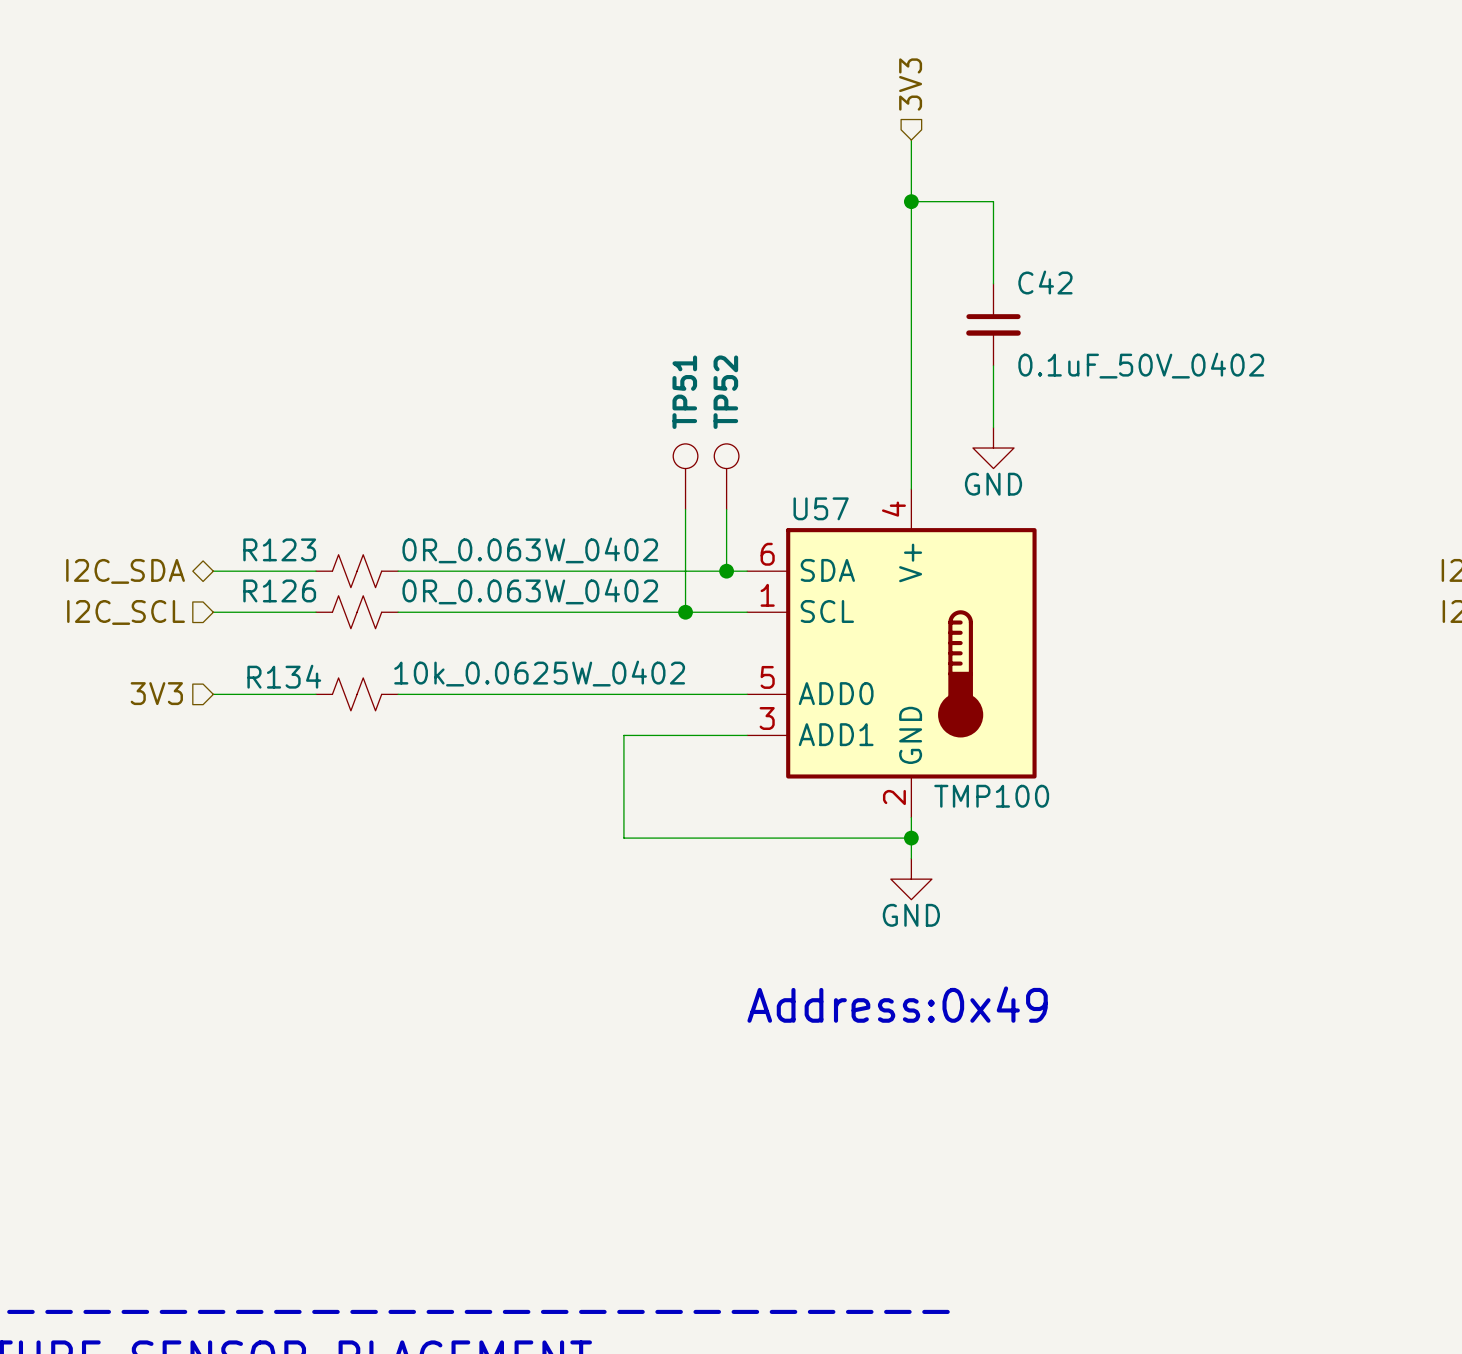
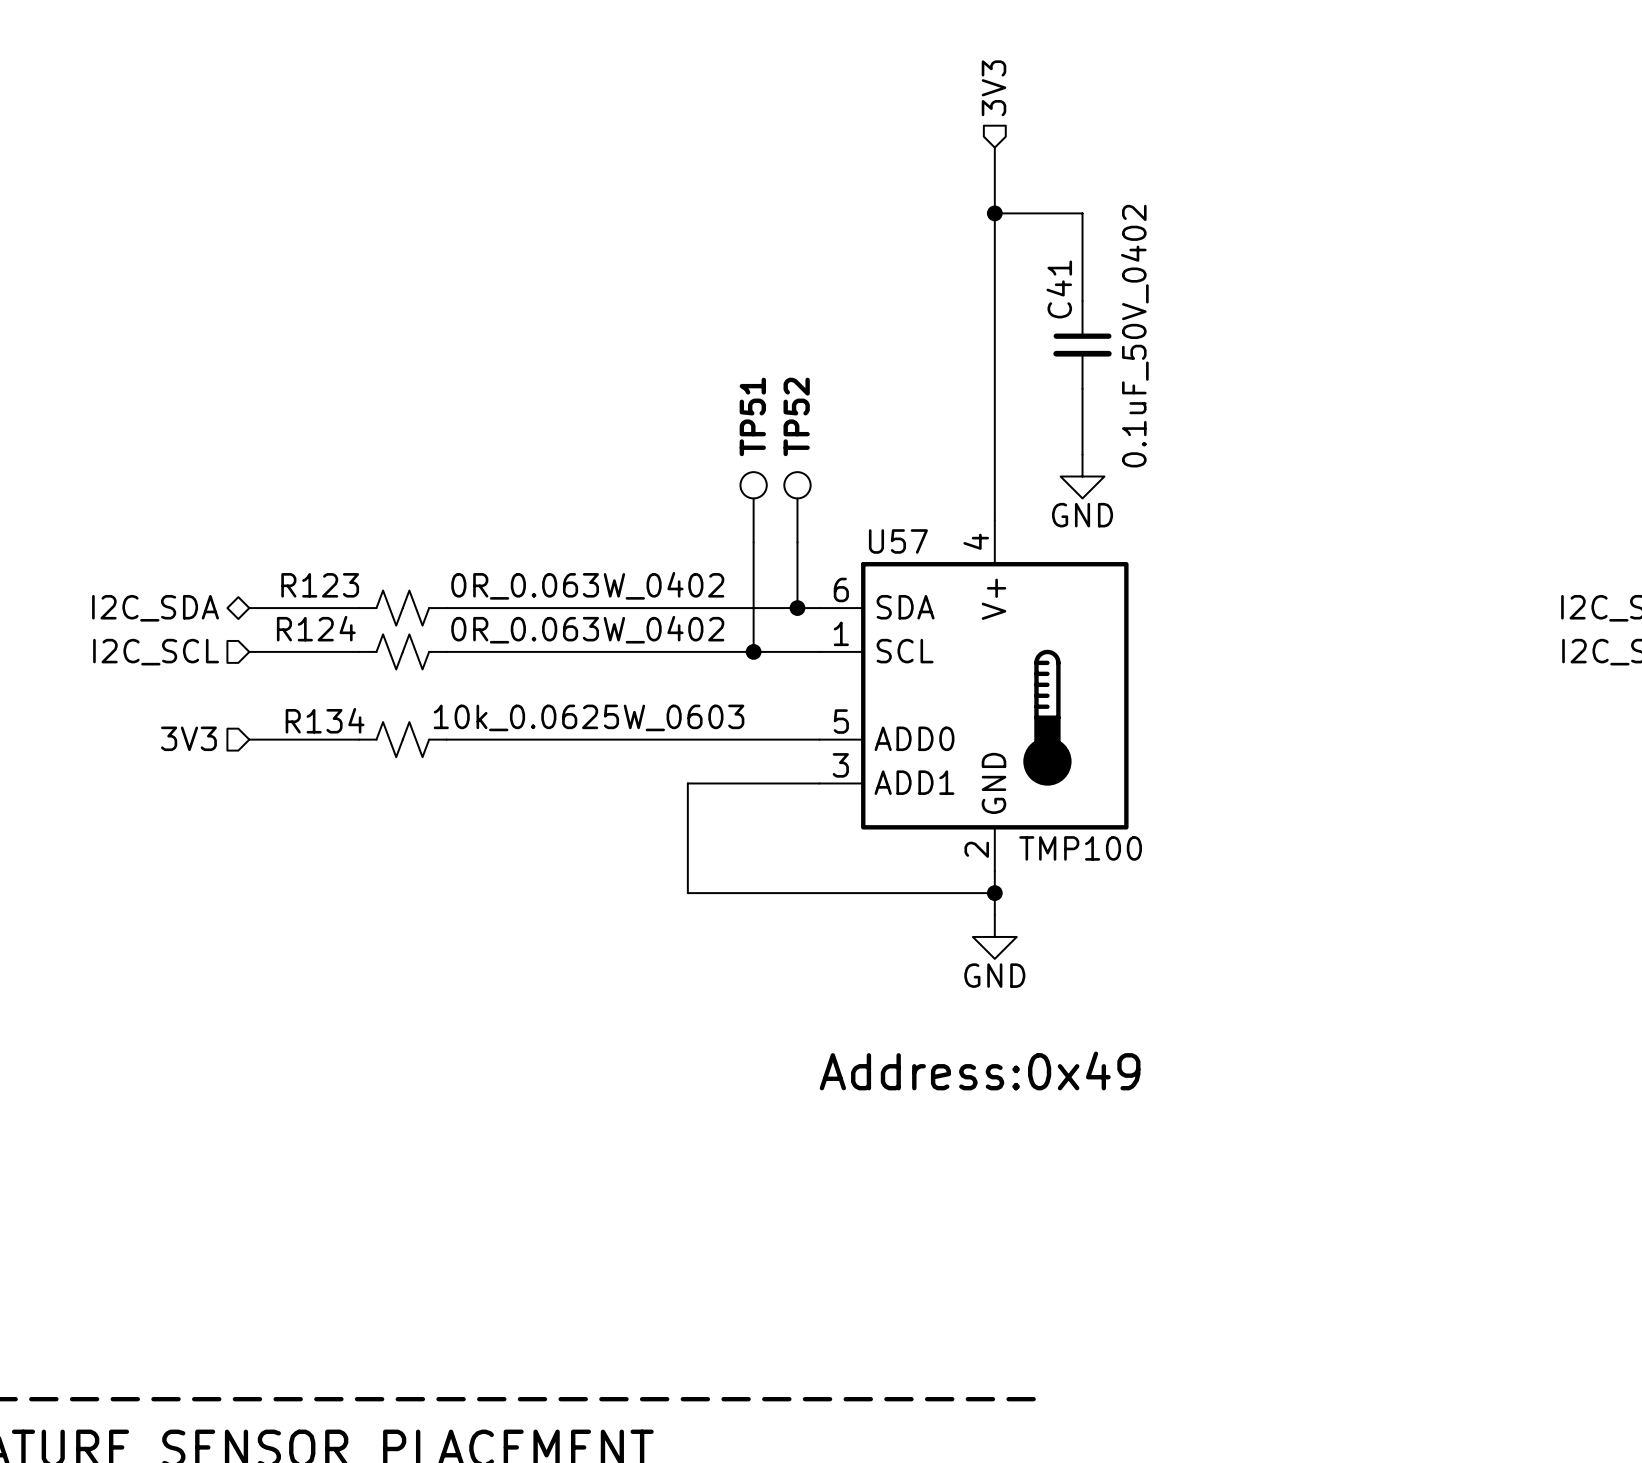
C42 name: C42 (1045, 282) -> C41 (1059, 289)
C42 value rotation: 0° (1141, 365) -> 90° counterclockwise (1134, 336)
R126 name: R126 (279, 590) -> R124 (316, 628)
R134 value: 10k_0.0625W_0402 (539, 673) -> 10k_0.0625W_0603 (589, 717)

